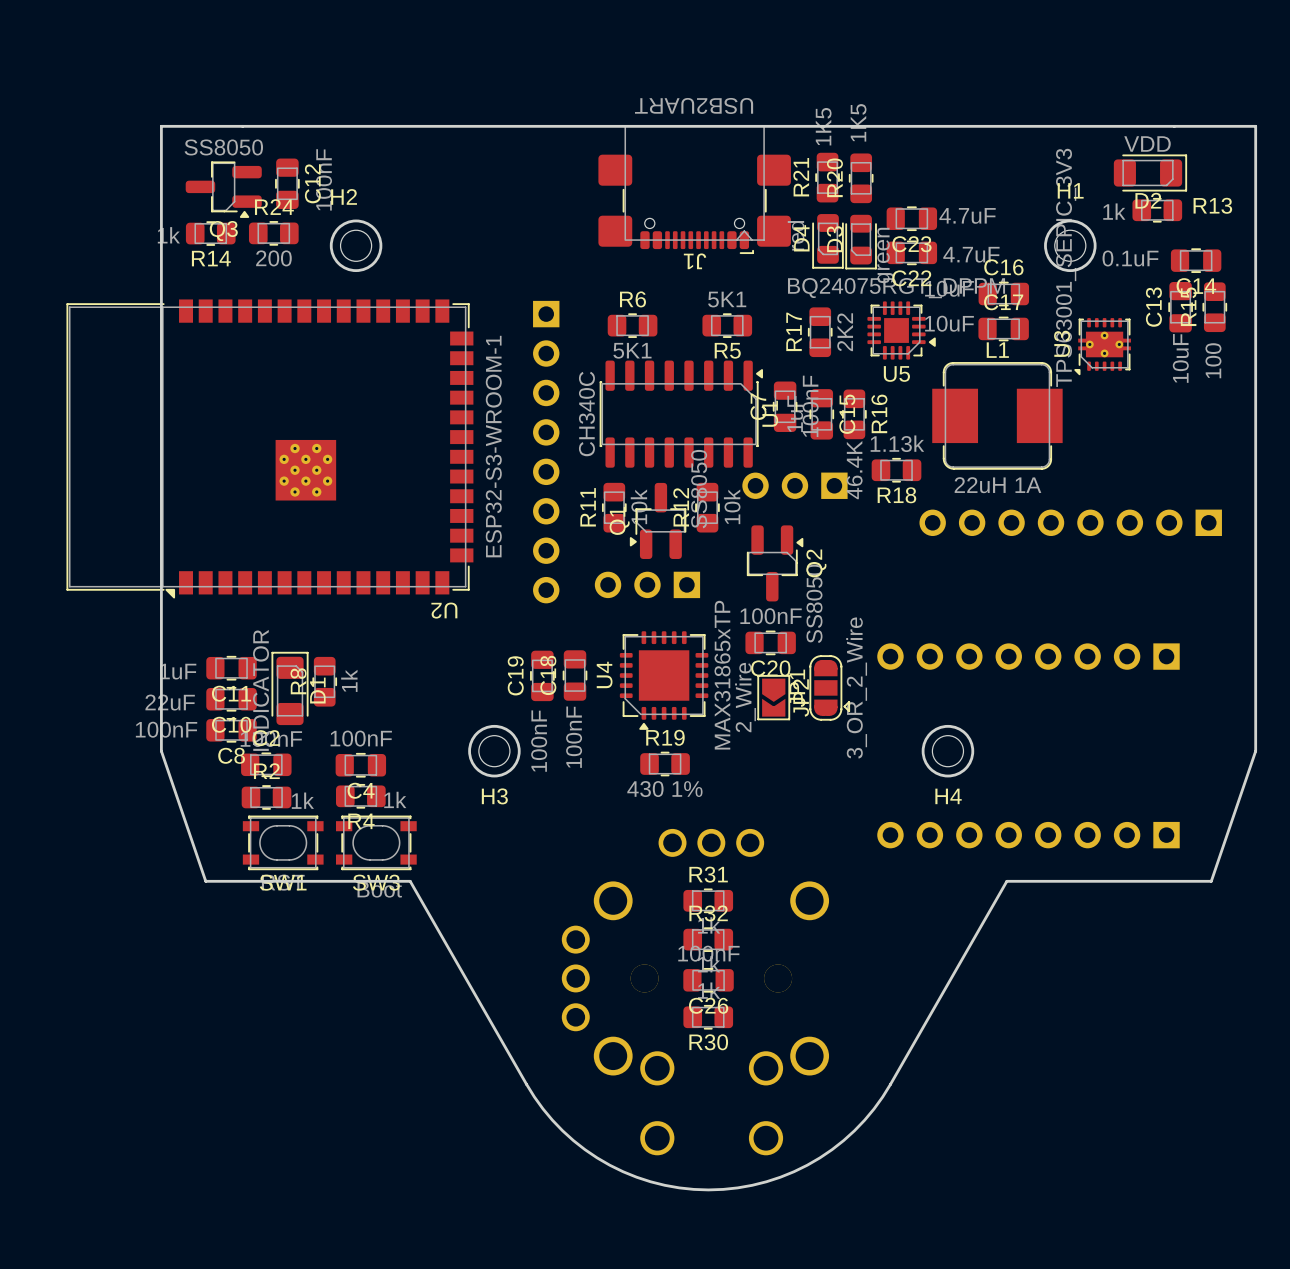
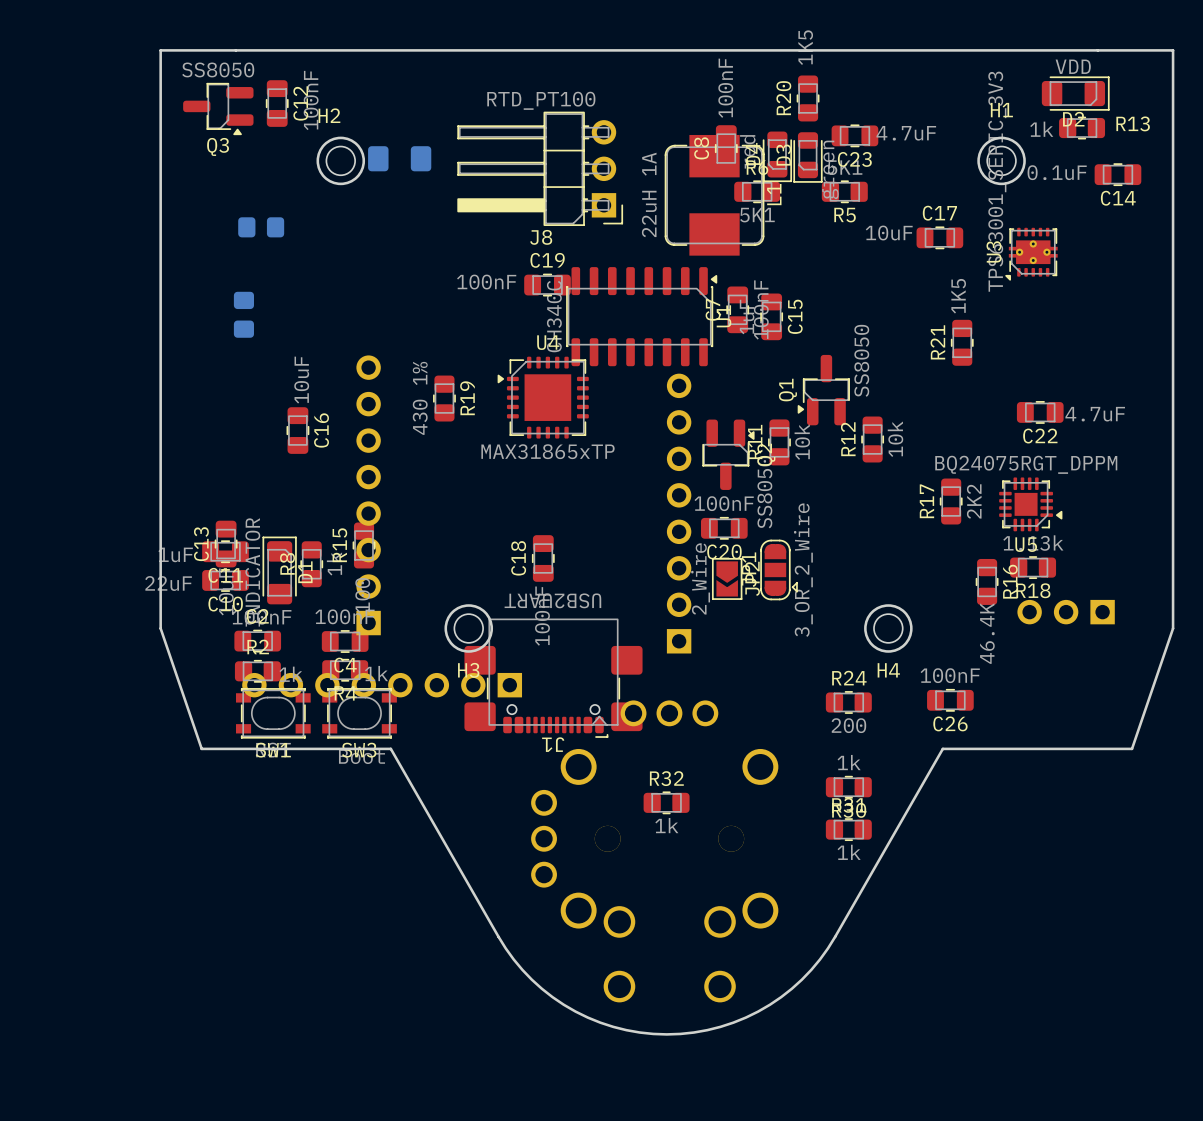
R21 position: (827, 177) -> (962, 342)
J1 position: (694, 189) -> (553, 678)
R14 side: top (210, 233) -> bottom (261, 227)
R24 position: (273, 233) -> (848, 702)
part: none -> (399, 158)
C22 position: (911, 252) -> (1040, 412)
C16 rotation: 0° (1003, 294) -> 90° clockwise (297, 430)
C16 position: (1003, 294) -> (297, 430)
C13 position: (1180, 307) -> (226, 544)
R15 position: (1214, 307) -> (364, 545)
R6 position: (632, 325) -> (757, 191)
R5 position: (727, 325) -> (844, 191)
U5 position: (901, 330) -> (1030, 504)
R17 position: (820, 332) -> (951, 501)
part: none -> (243, 314)
R16 position: (854, 414) -> (987, 581)
L1 rotation: 0° (997, 415) -> 90° clockwise (714, 195)
L1 position: (997, 415) -> (714, 195)
U2: ESP32-S3-WROOM-1 (269, 448) -> none
part: (546, 452) -> none
R18 position: (896, 470) -> (1033, 567)
part: (794, 485) -> none
R11 position: (614, 507) -> (779, 442)
R12 position: (707, 507) -> (872, 439)
Q1 position: (658, 520) -> (823, 390)
part: (1070, 522) -> none
J8 side: bottom (647, 584) -> top (540, 168)
part: none -> (368, 495)
part: none -> (679, 513)
part: (1028, 656) -> none
C19 rotation: 0° (542, 675) -> 90° clockwise (547, 285)
C19 position: (542, 675) -> (547, 285)
U4 rotation: 0° (664, 680) -> 90° clockwise (543, 397)
U4 position: (664, 680) -> (543, 397)
C8 rotation: 0° (231, 730) -> 90° clockwise (726, 148)
C8 position: (231, 730) -> (726, 148)
part: none -> (1066, 612)
R19 rotation: 0° (665, 764) -> 90° clockwise (444, 398)
R19 position: (665, 764) -> (444, 398)
part: none -> (382, 685)
part: (1028, 835) -> none
R31 position: (708, 900) -> (848, 829)
C26 position: (708, 980) -> (950, 700)
R30 position: (708, 1017) -> (848, 787)

